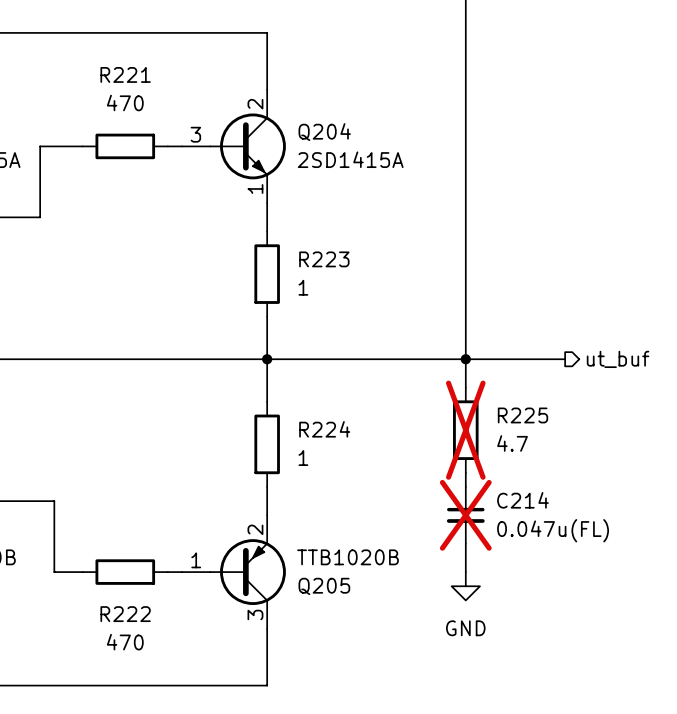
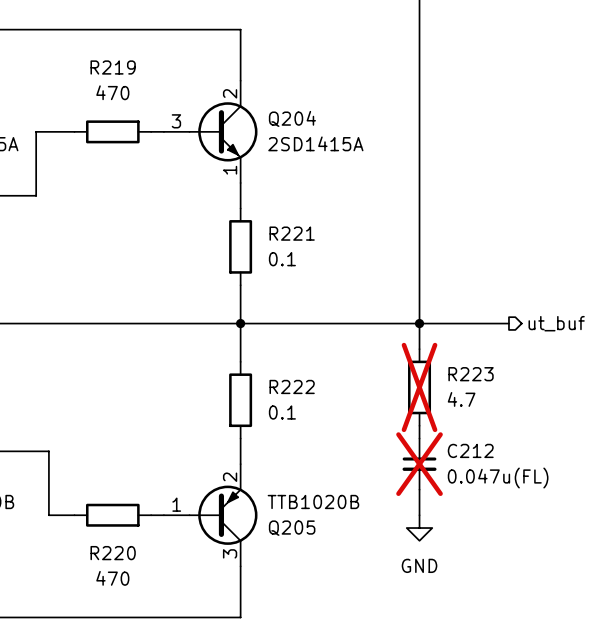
R221 name: R221 (125, 74) -> R219 (113, 67)
R223 name: R223 (324, 259) -> R221 (292, 233)
R223 value: 1 (303, 287) -> 0.1 (282, 259)
R225 name: R225 (522, 415) -> R223 (471, 374)
R224 name: R224 (324, 429) -> R222 (292, 386)
R224 value: 1 (303, 458) -> 0.1 (282, 412)
C214 name: C214 (522, 500) -> C212 (470, 450)
R222 name: R222 (125, 614) -> R220 (113, 553)

